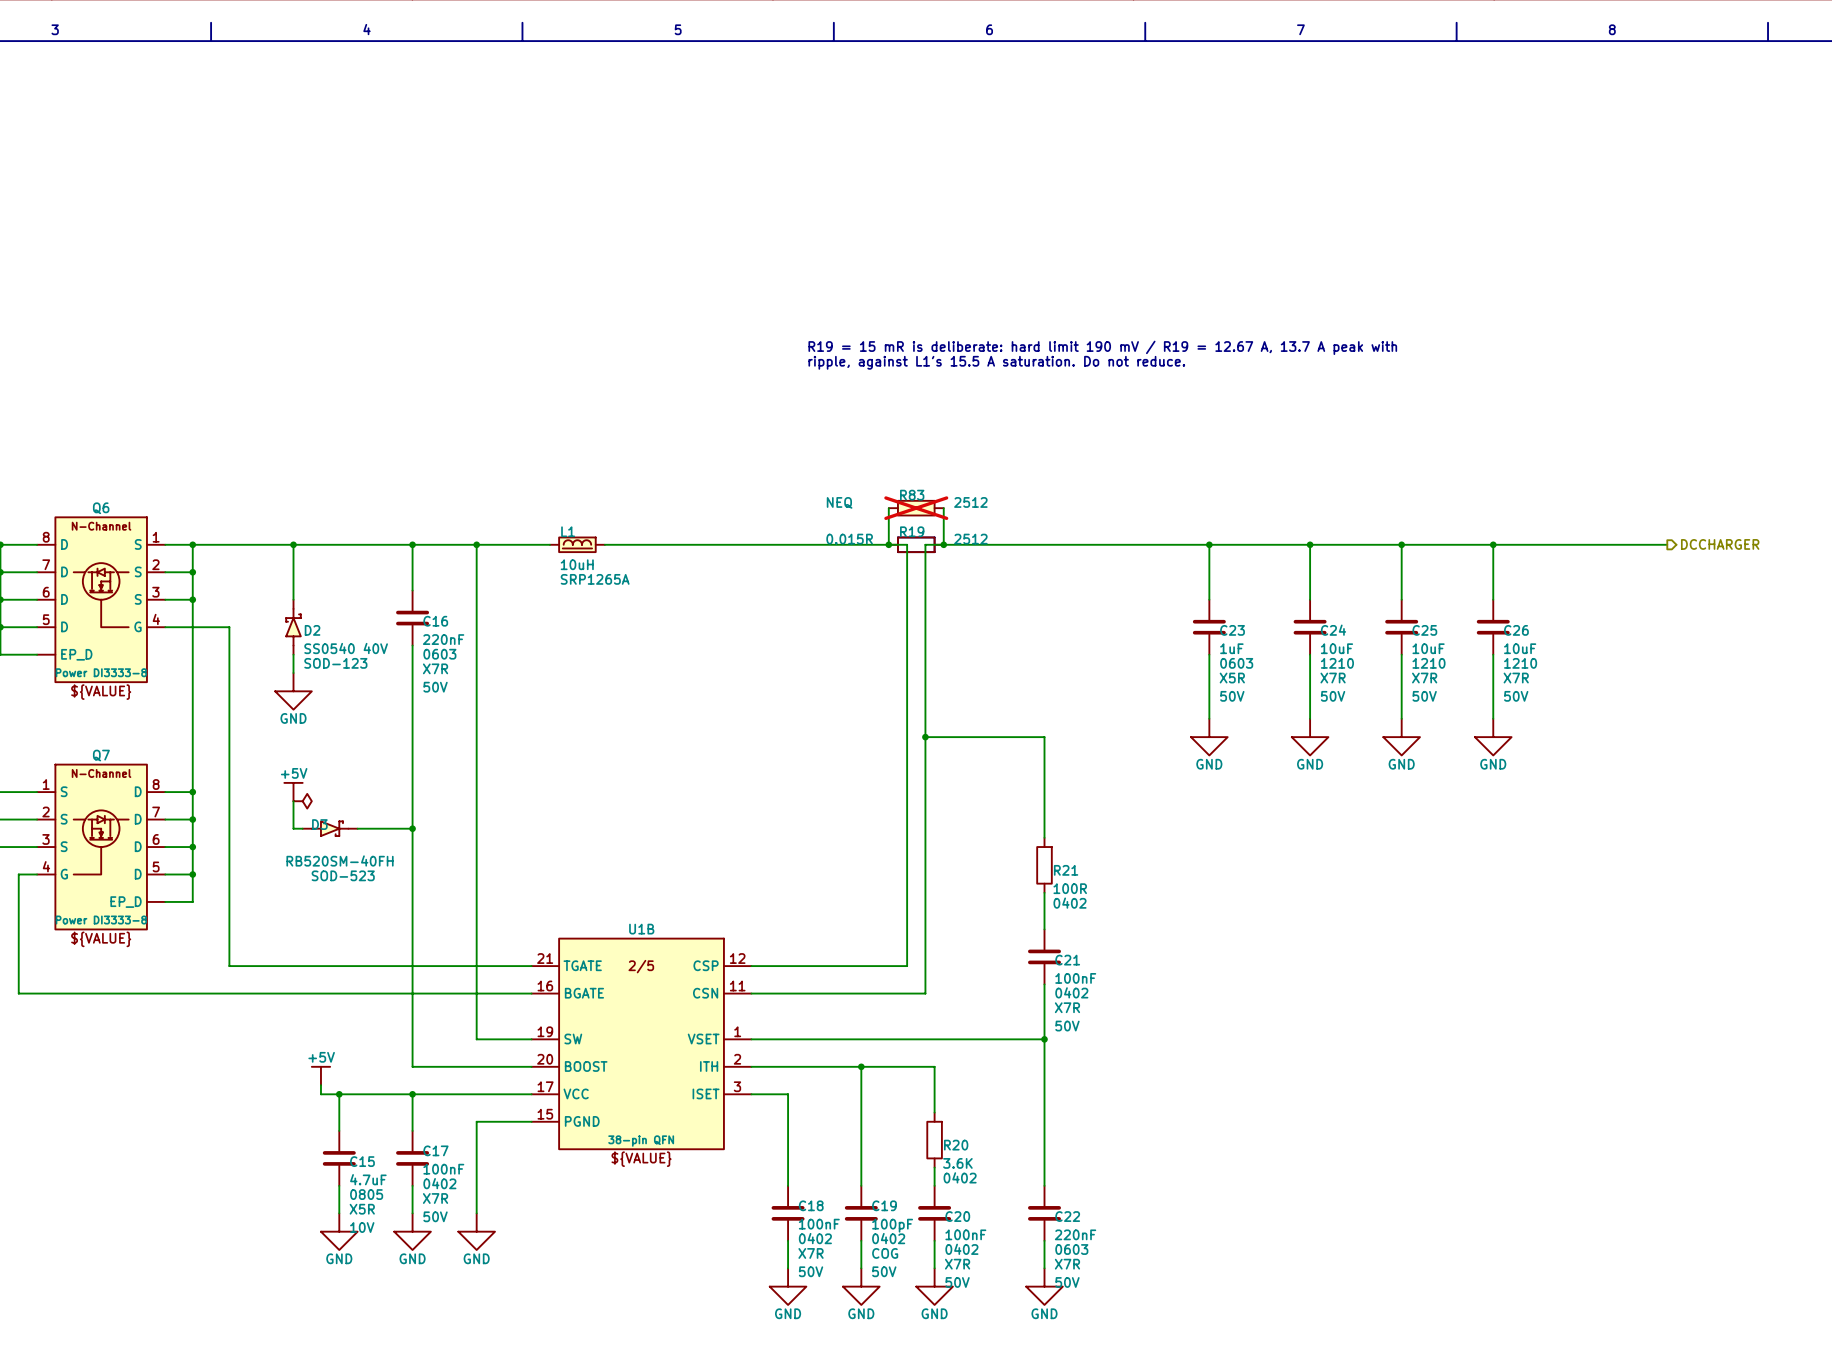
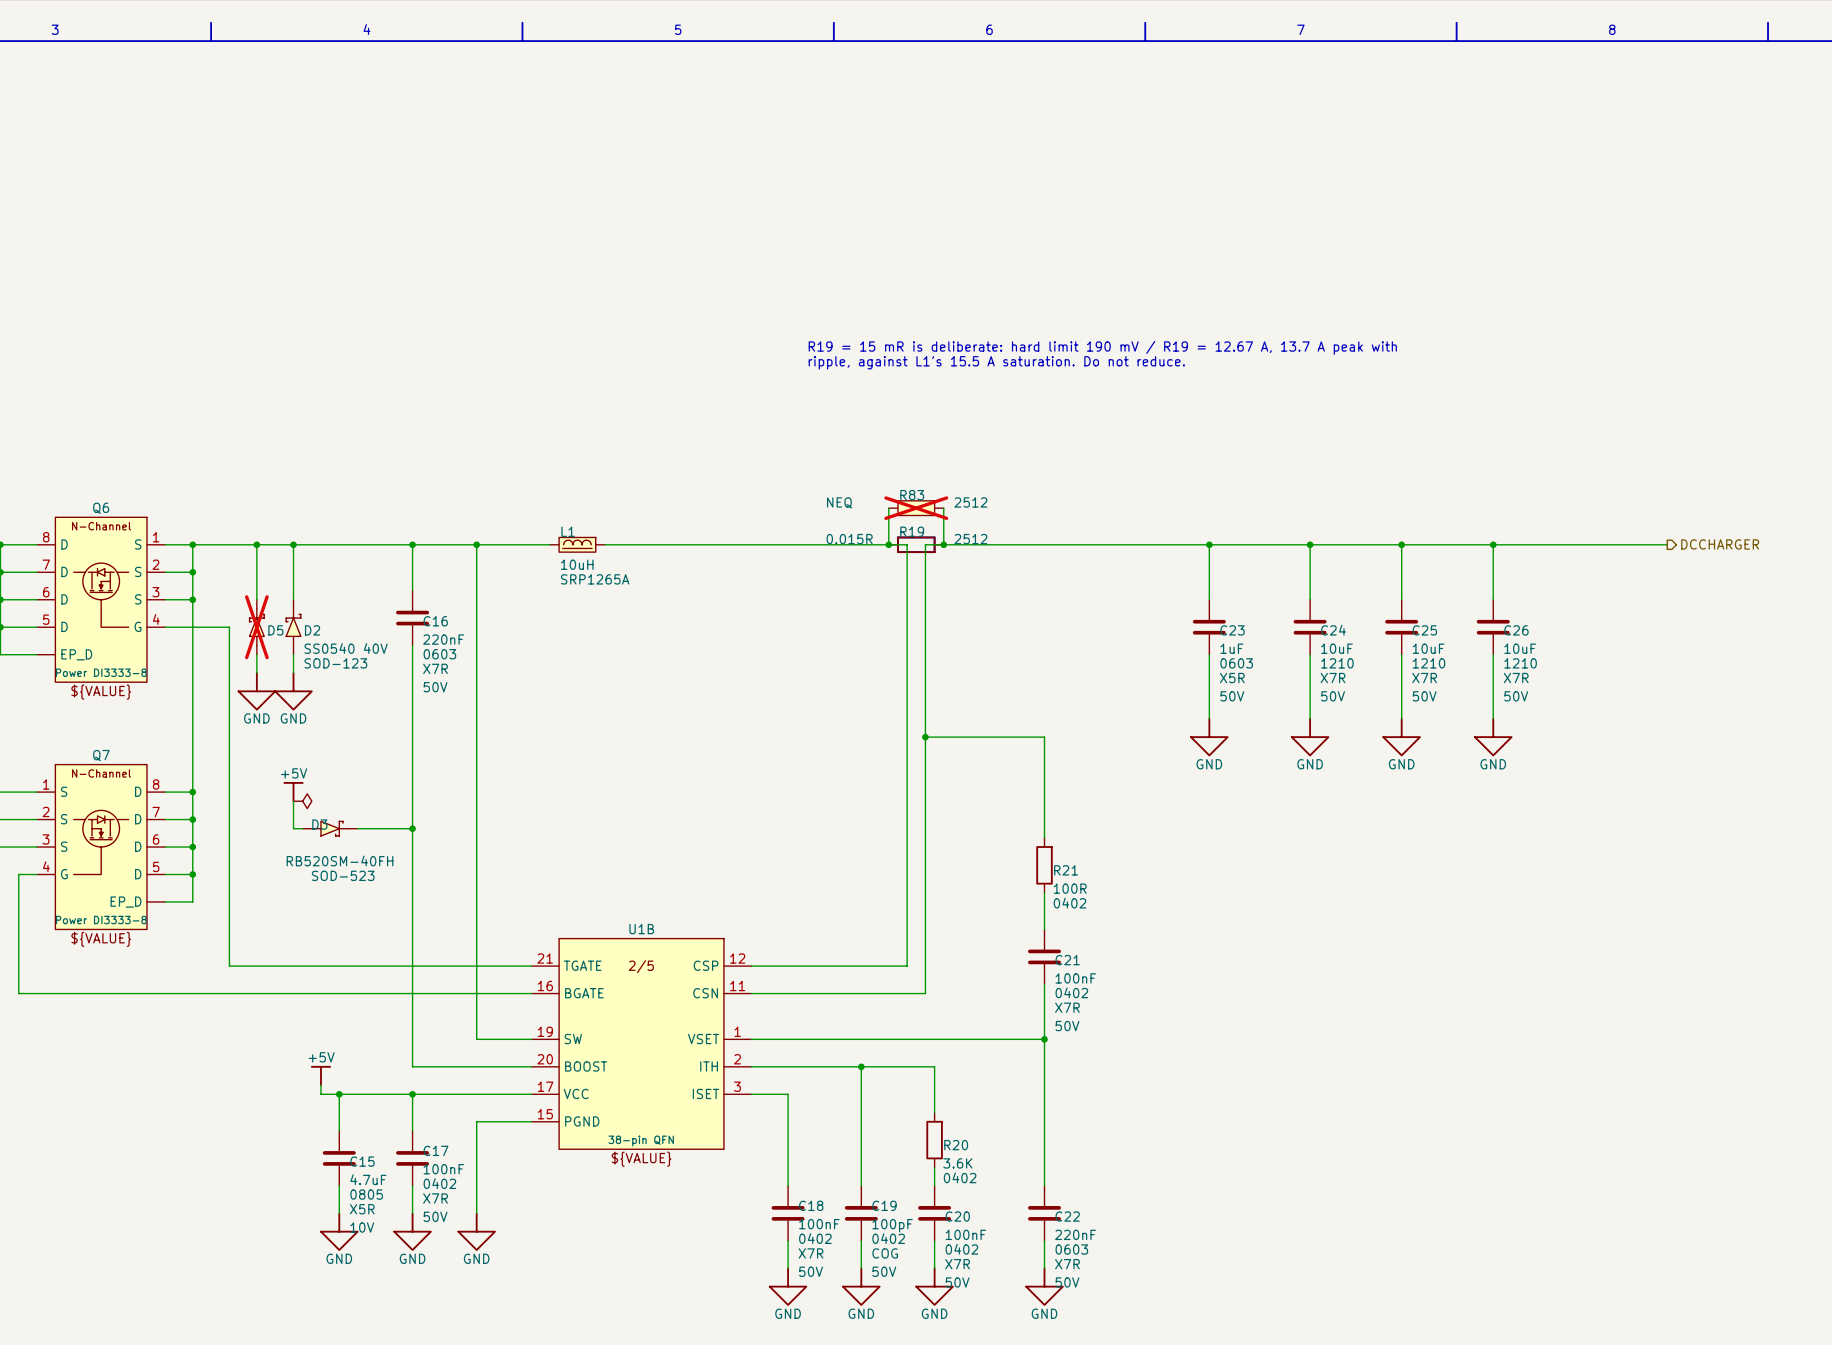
wire: none -> (256, 544) (256, 599)
junction: none -> (256, 544)
D5: none -> (256, 627)
wire: none -> (256, 654) (256, 673)
power symbol: none -> GND (256, 691)

